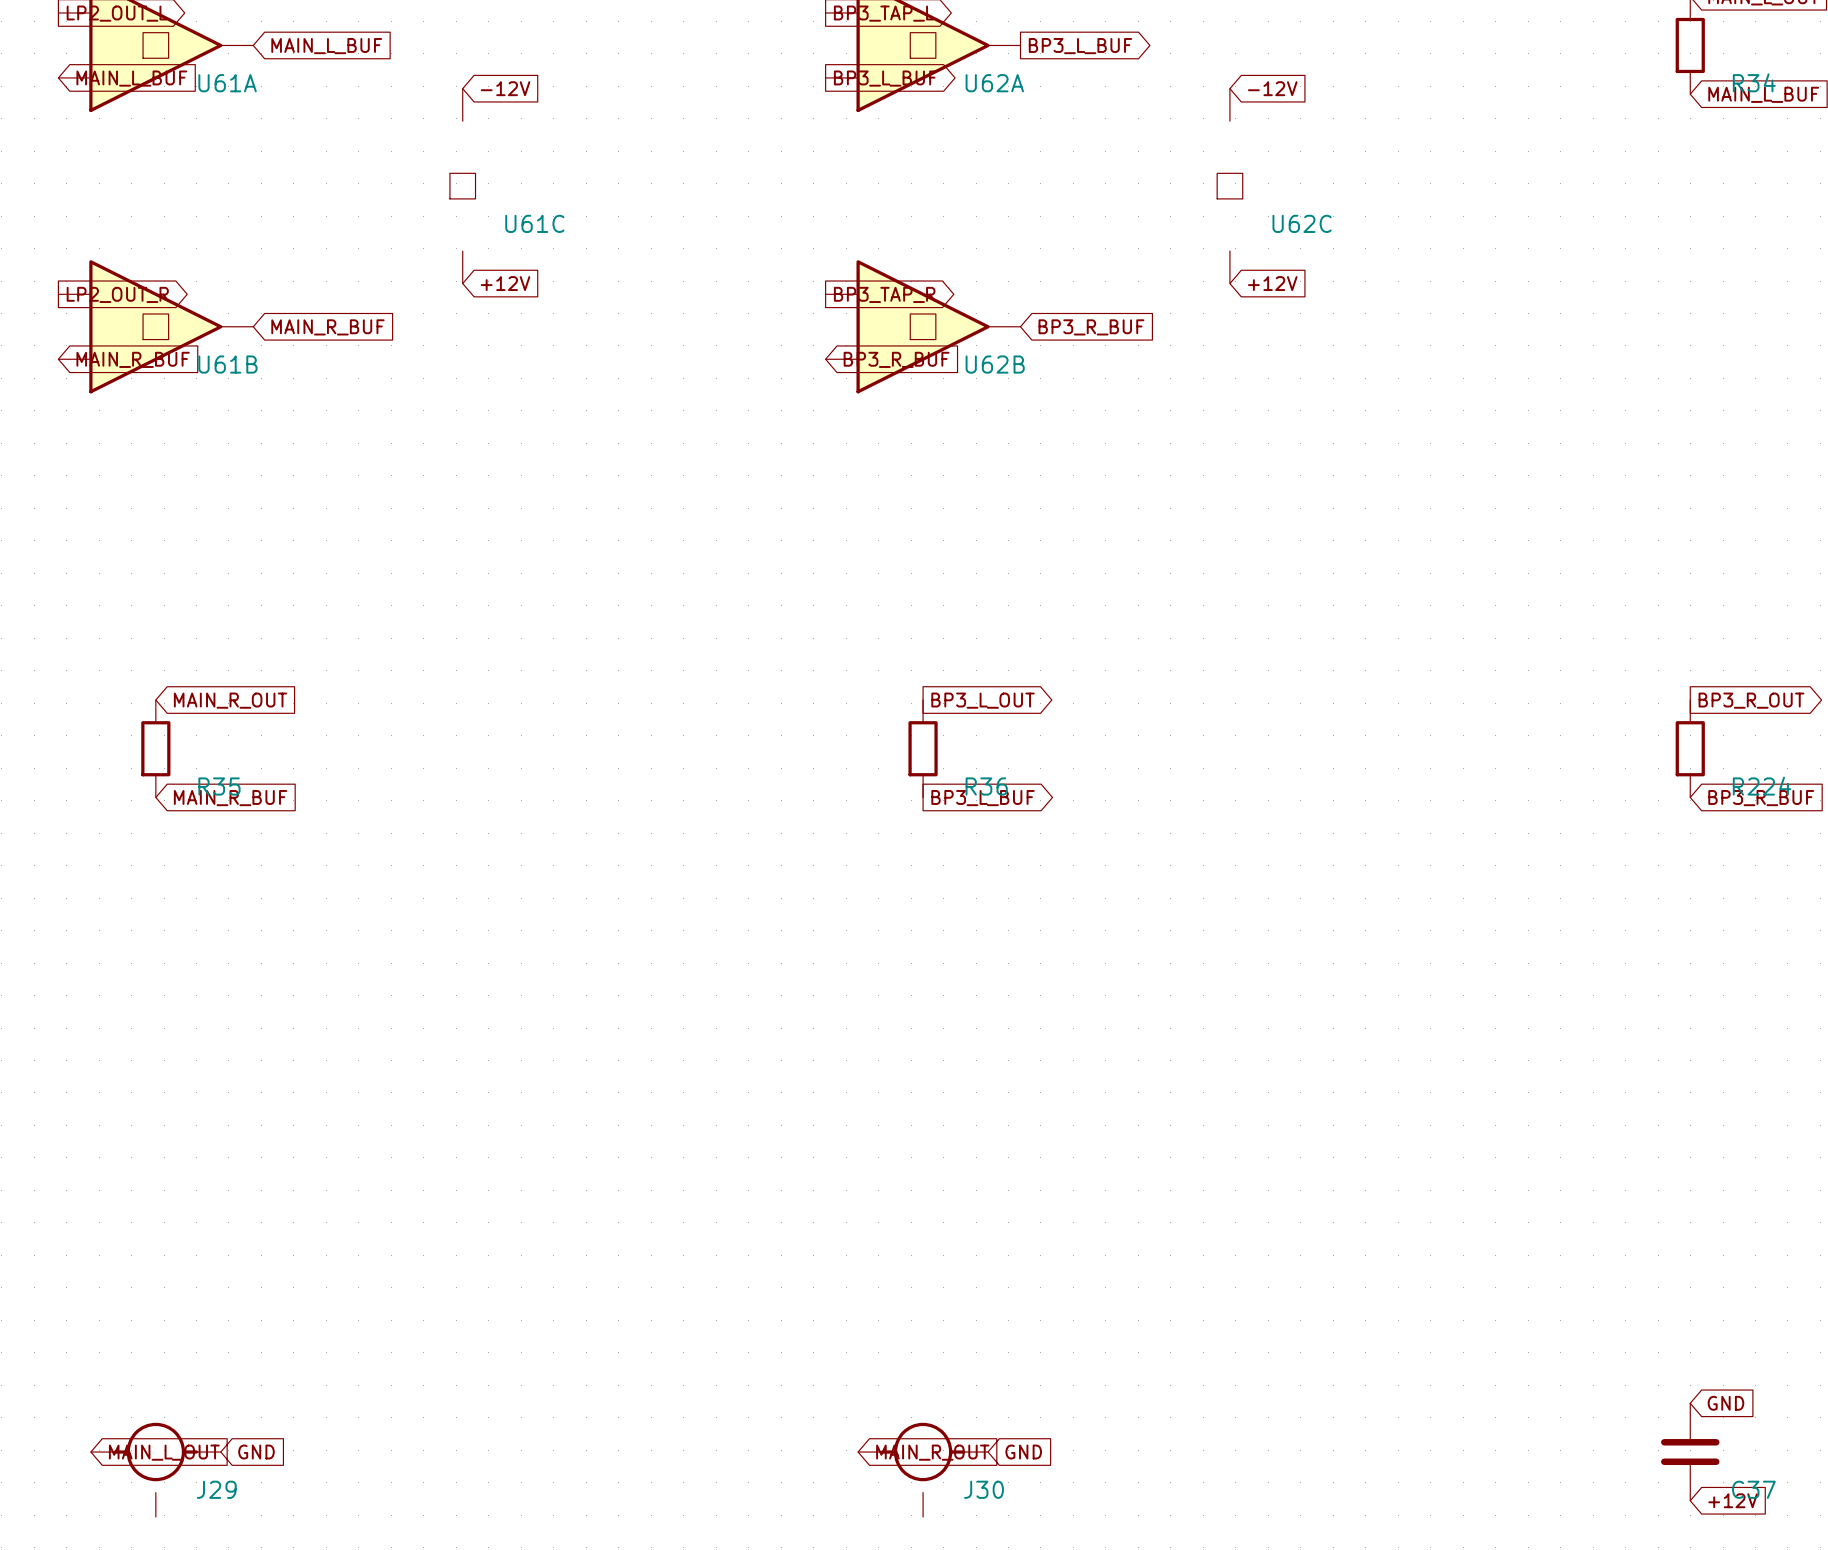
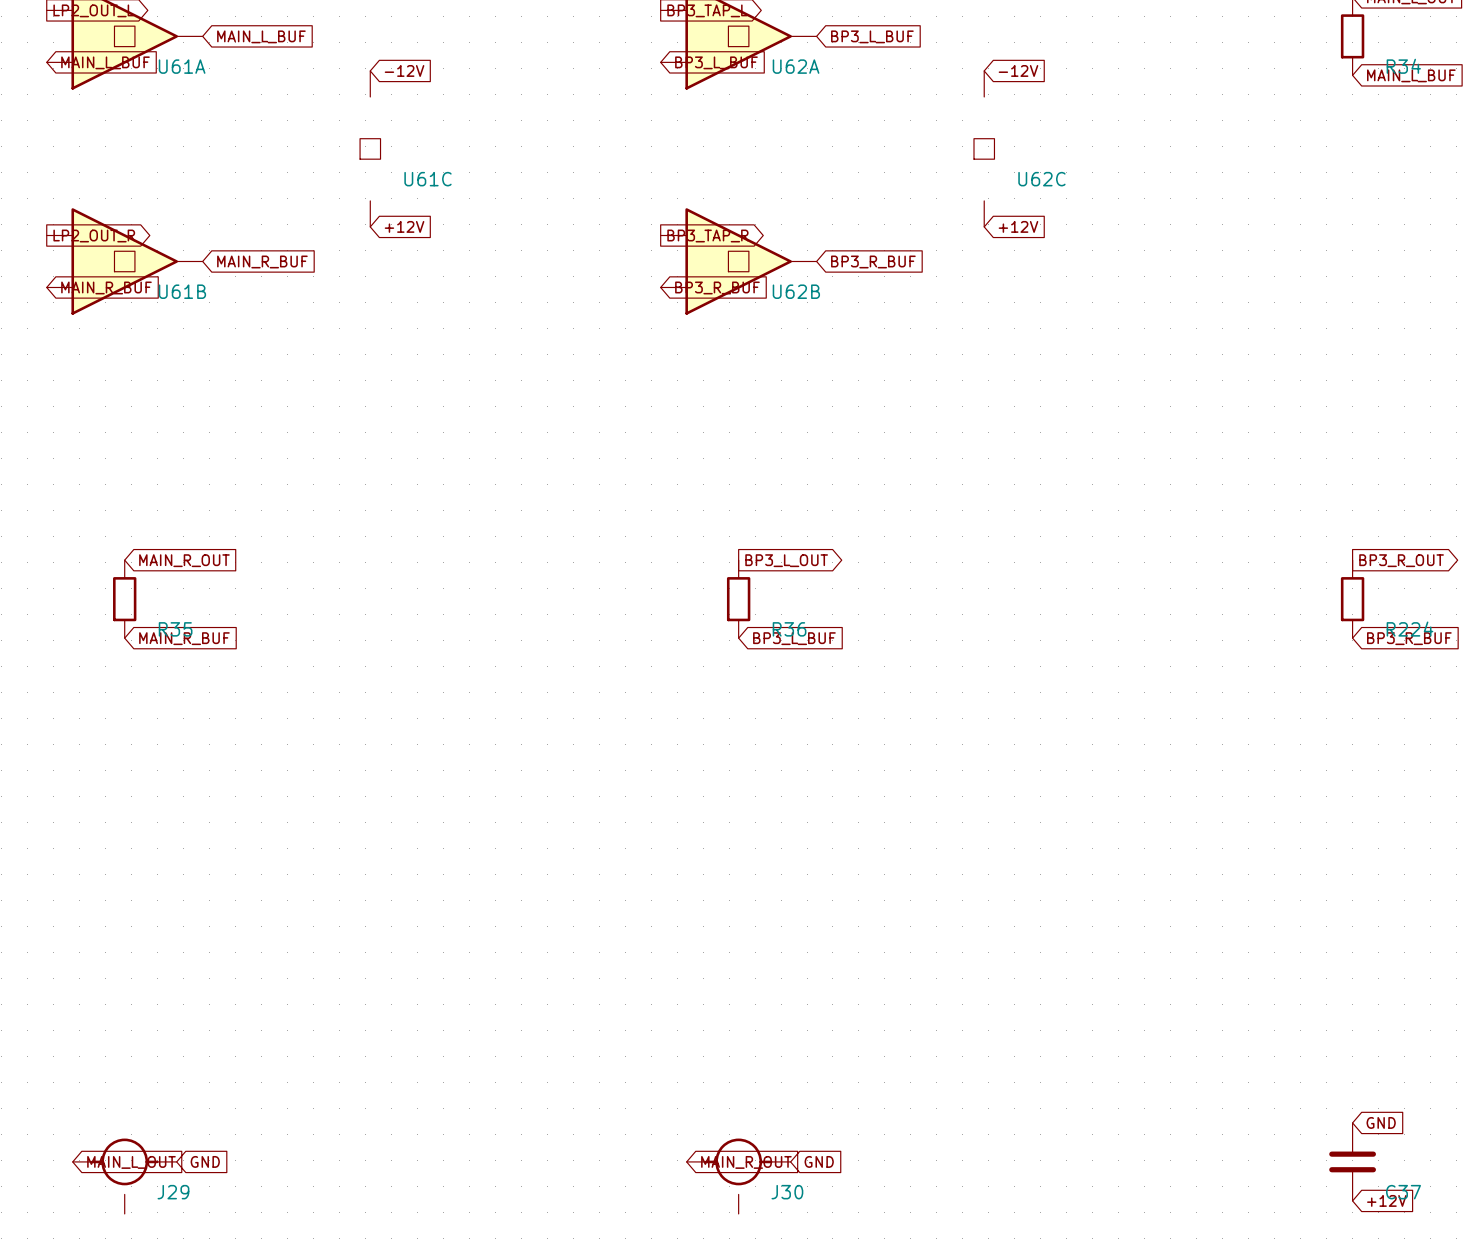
global label shape: output (1080, 46) -> input (872, 36)
global label shape: output (885, 78) -> input (716, 62)
global label shape: output (983, 798) -> input (794, 638)

